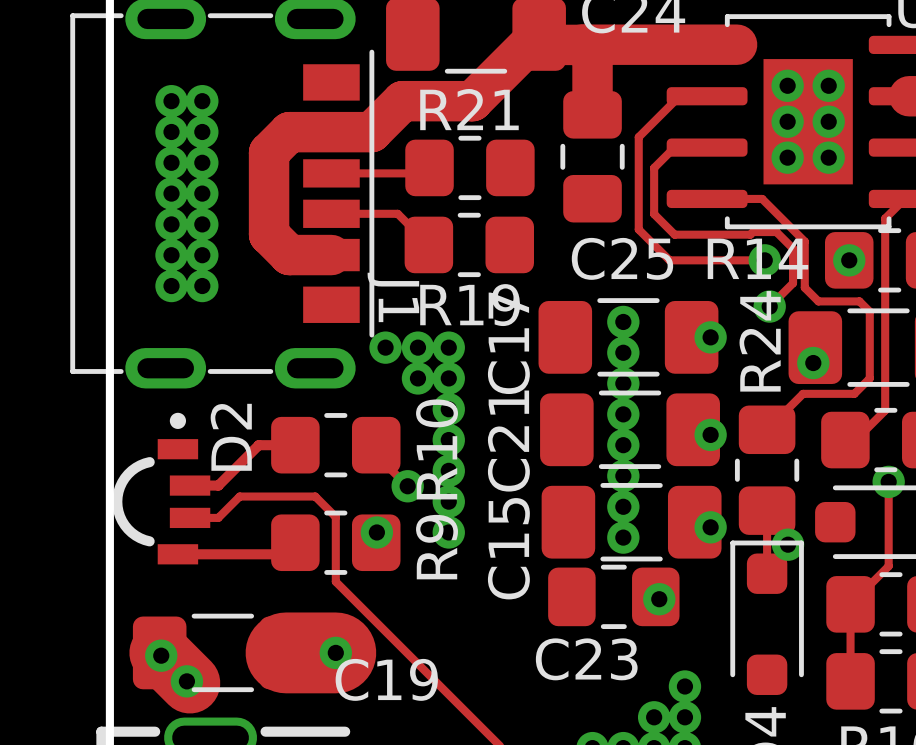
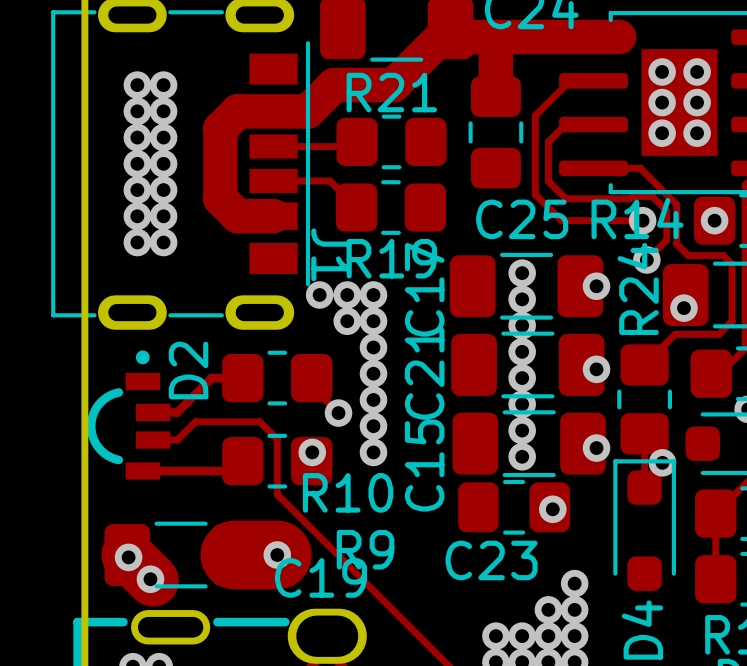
R10 name rotation: 0° (437, 449) -> 90° clockwise (348, 492)
R9 name rotation: 0° (437, 547) -> 90° clockwise (365, 549)

